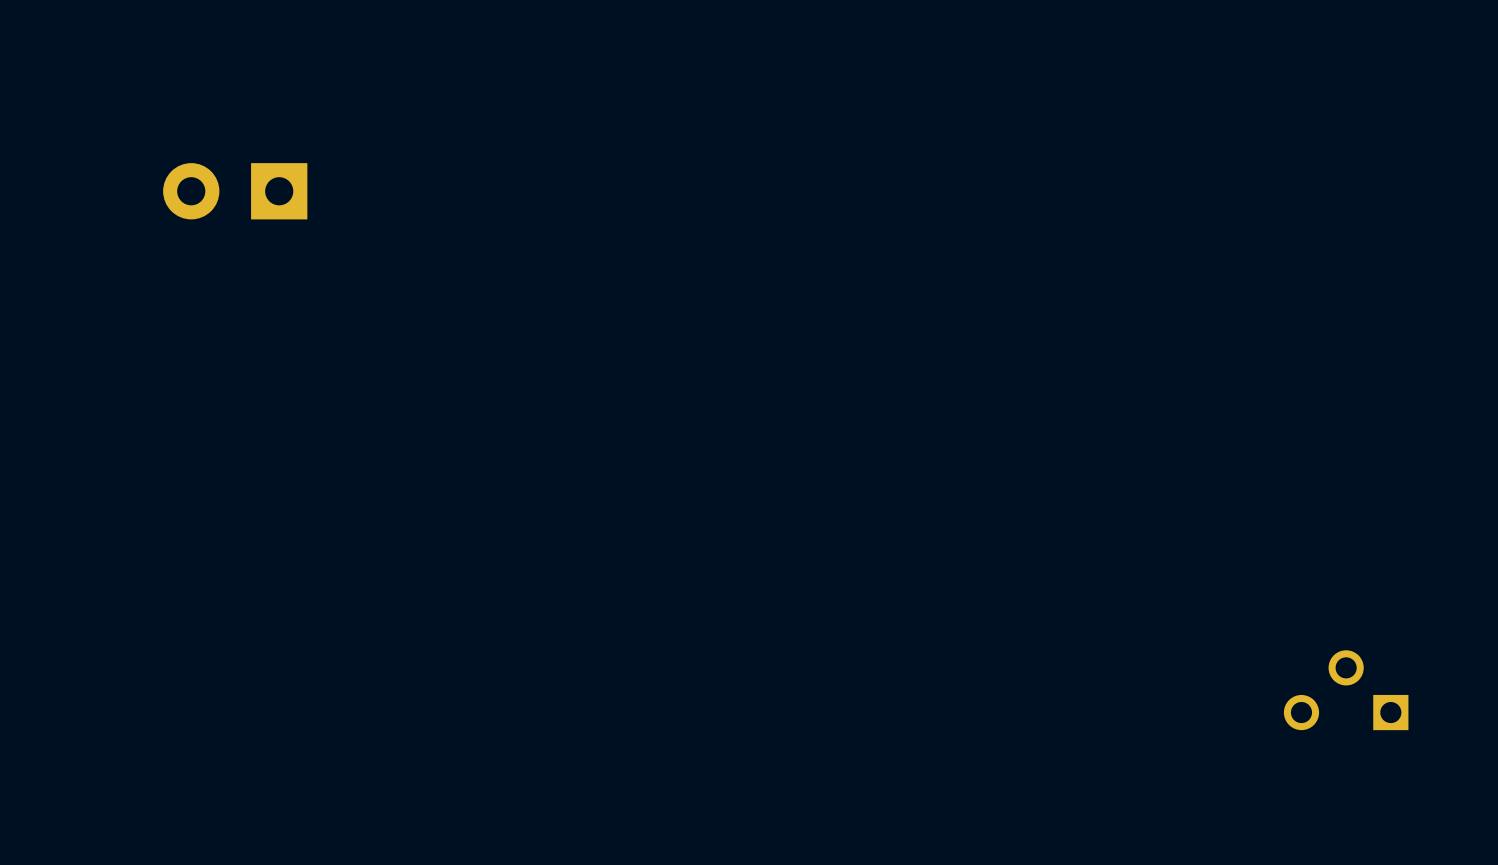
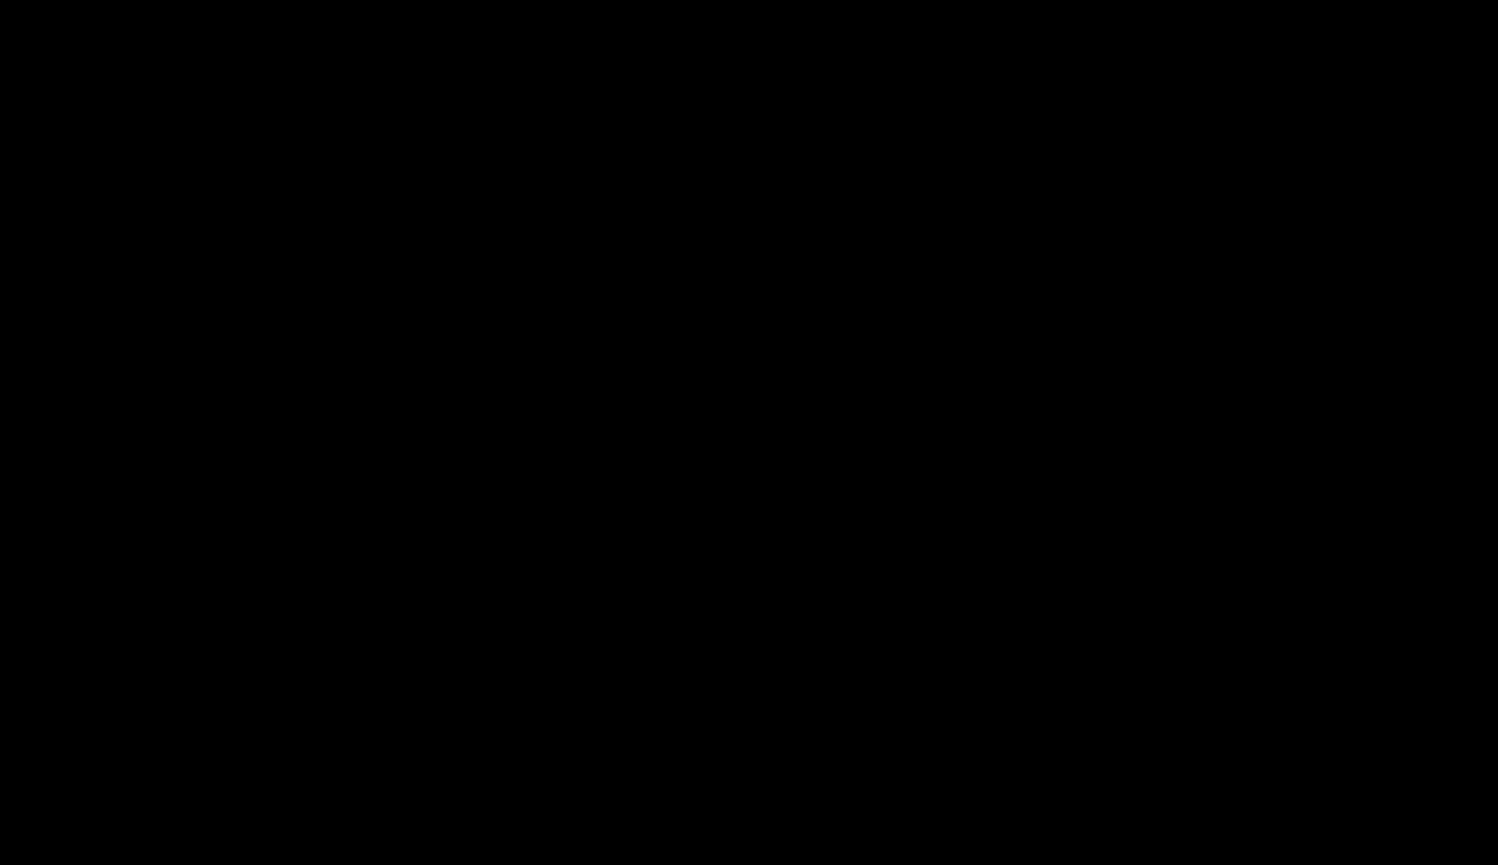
part: (235, 191) -> none
part: (1346, 690) -> none

